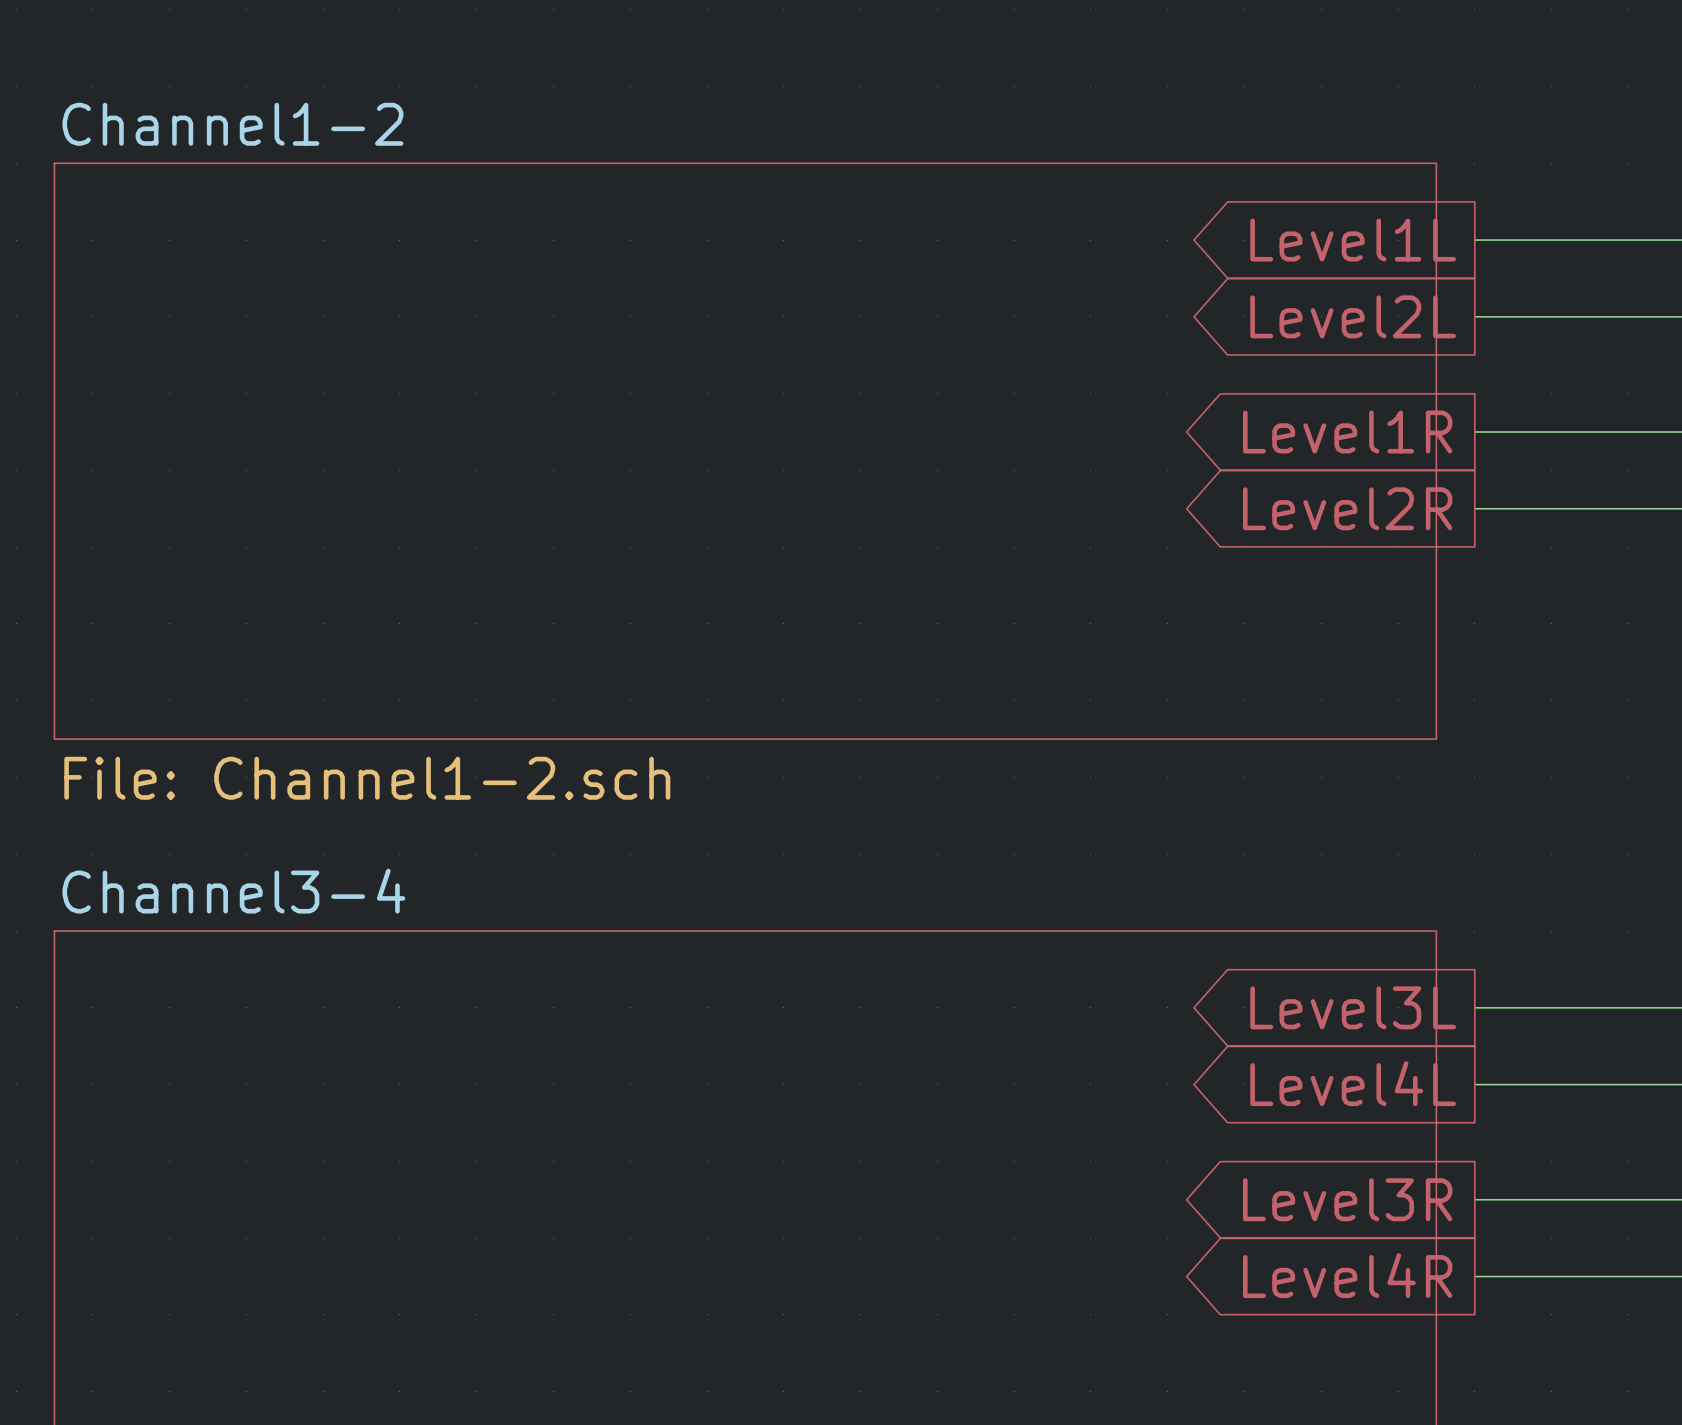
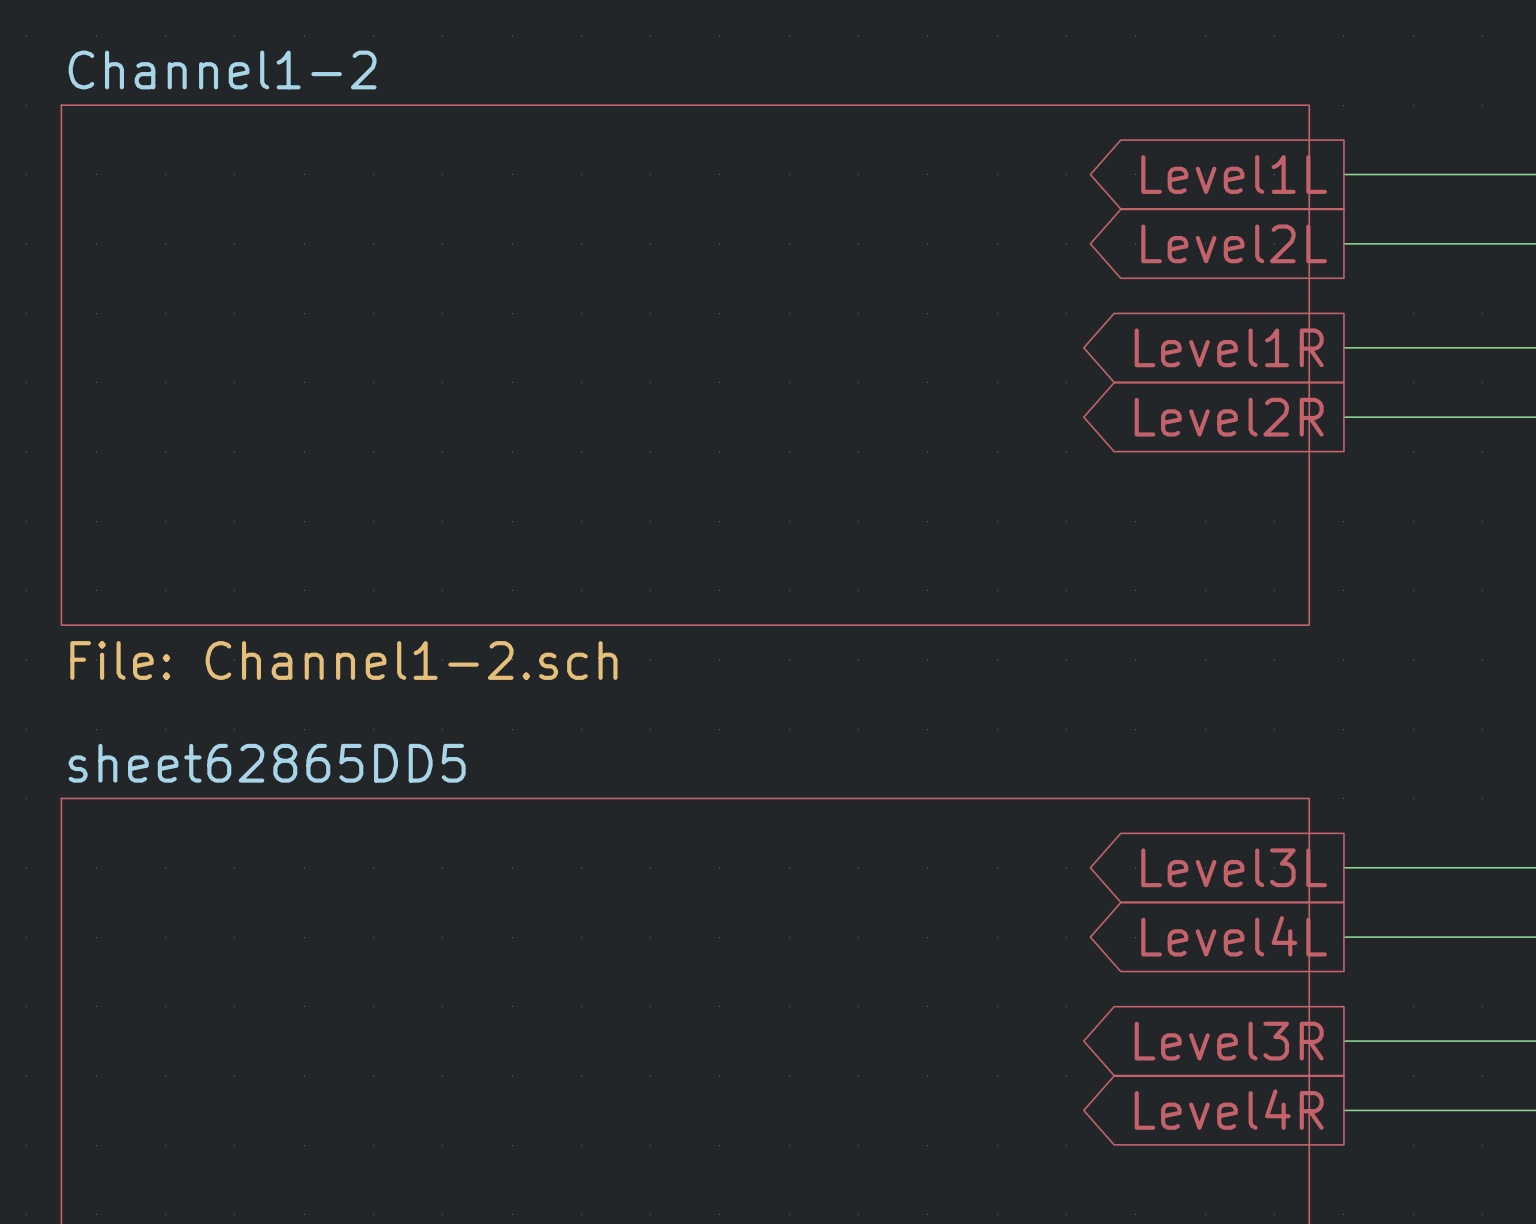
sheet Channel3-4 name: Channel3-4 (233, 891) -> sheet62865DD5 (267, 763)

